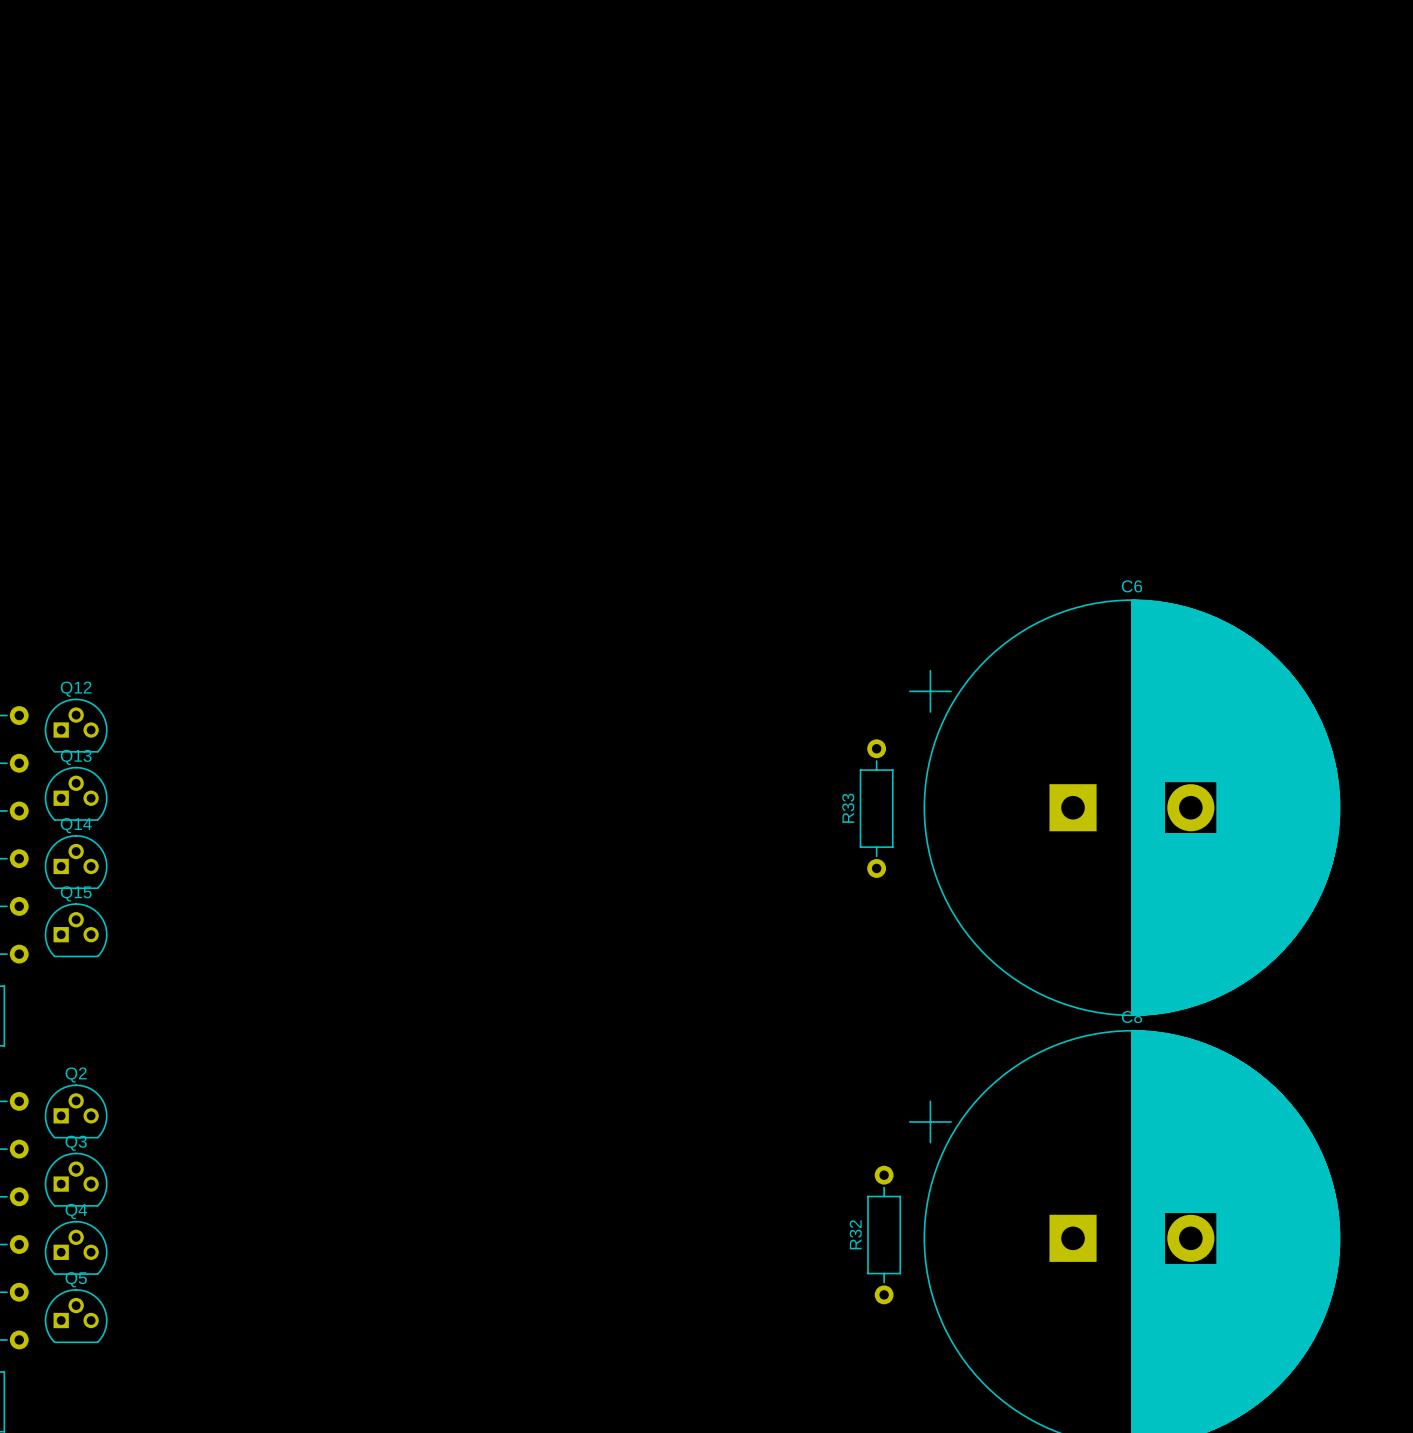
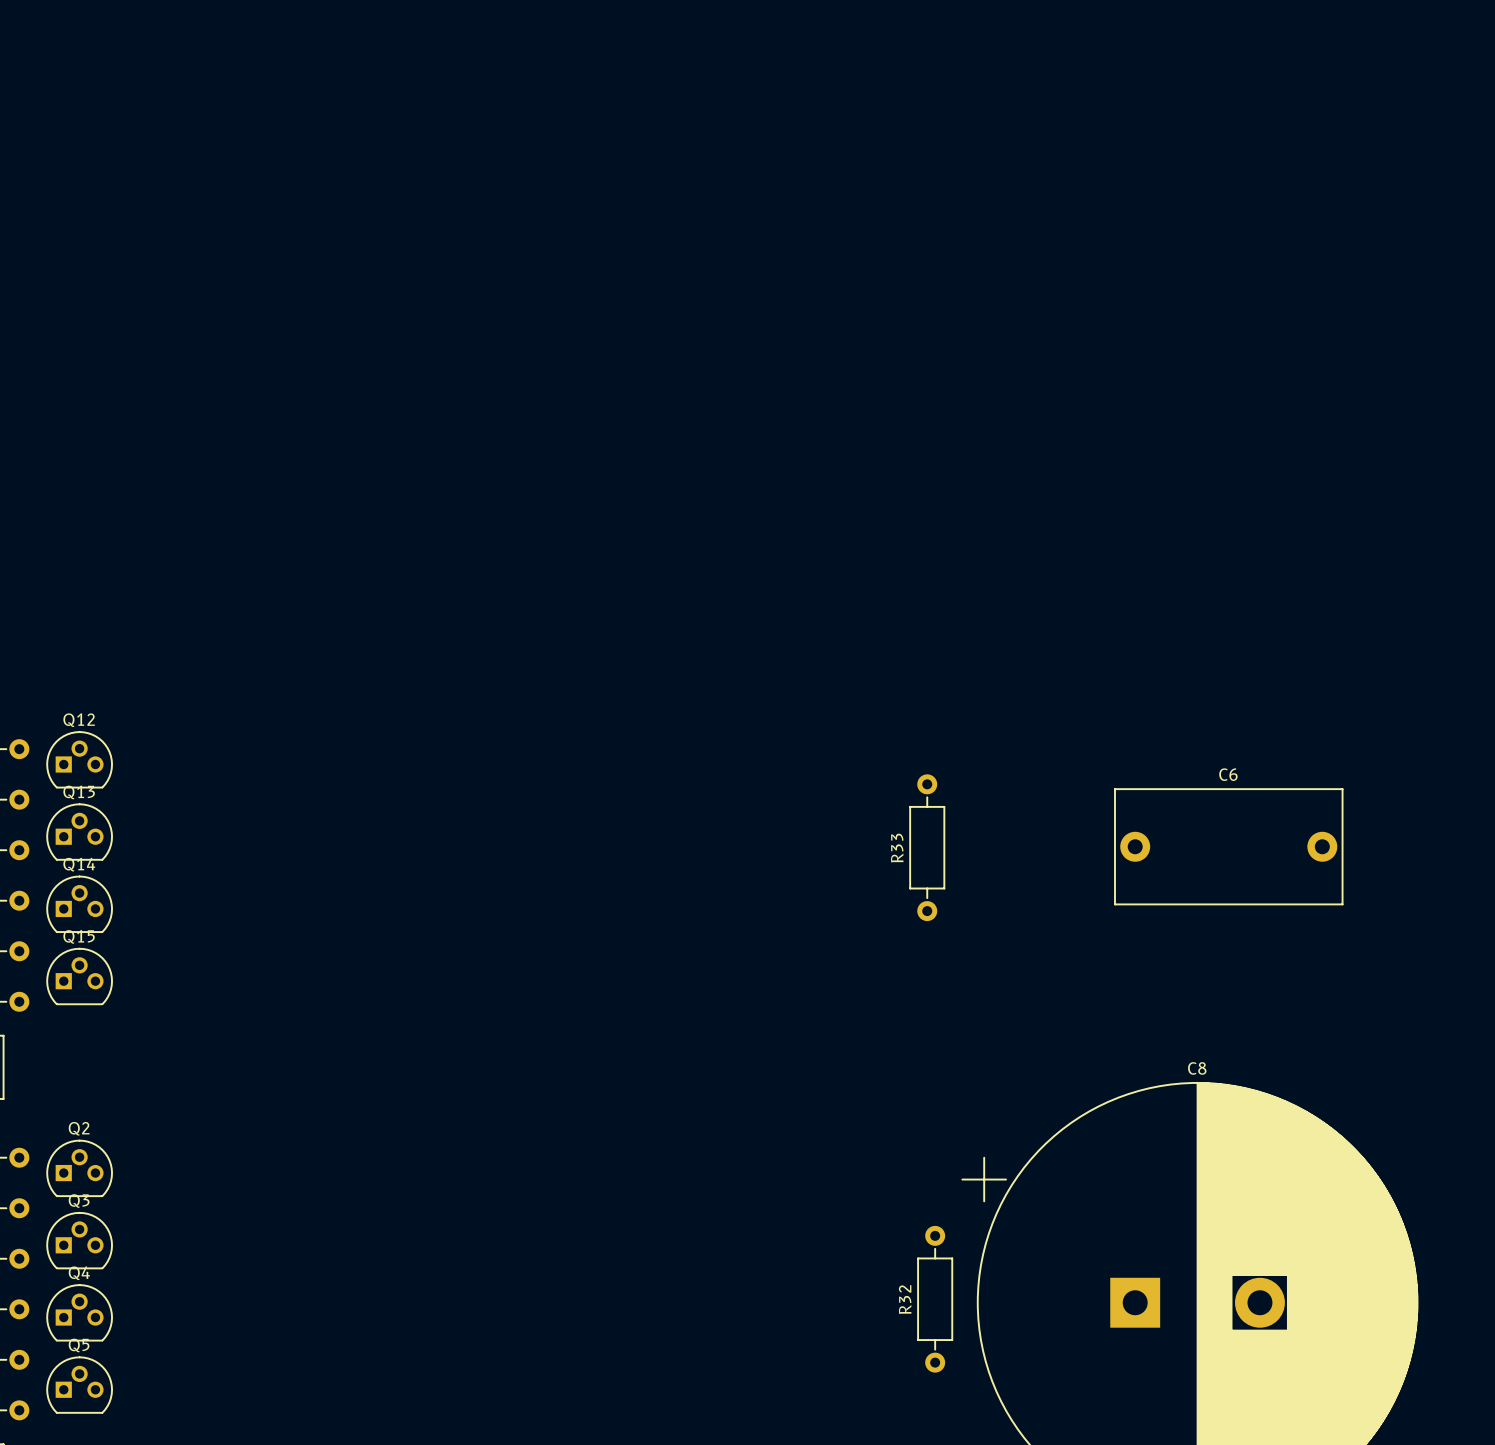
C6 name position: C6 (1131, 586) -> C6 (1228, 774)
C6 footprint: [909, 599, 1341, 1017] -> [1114, 788, 1344, 906]

